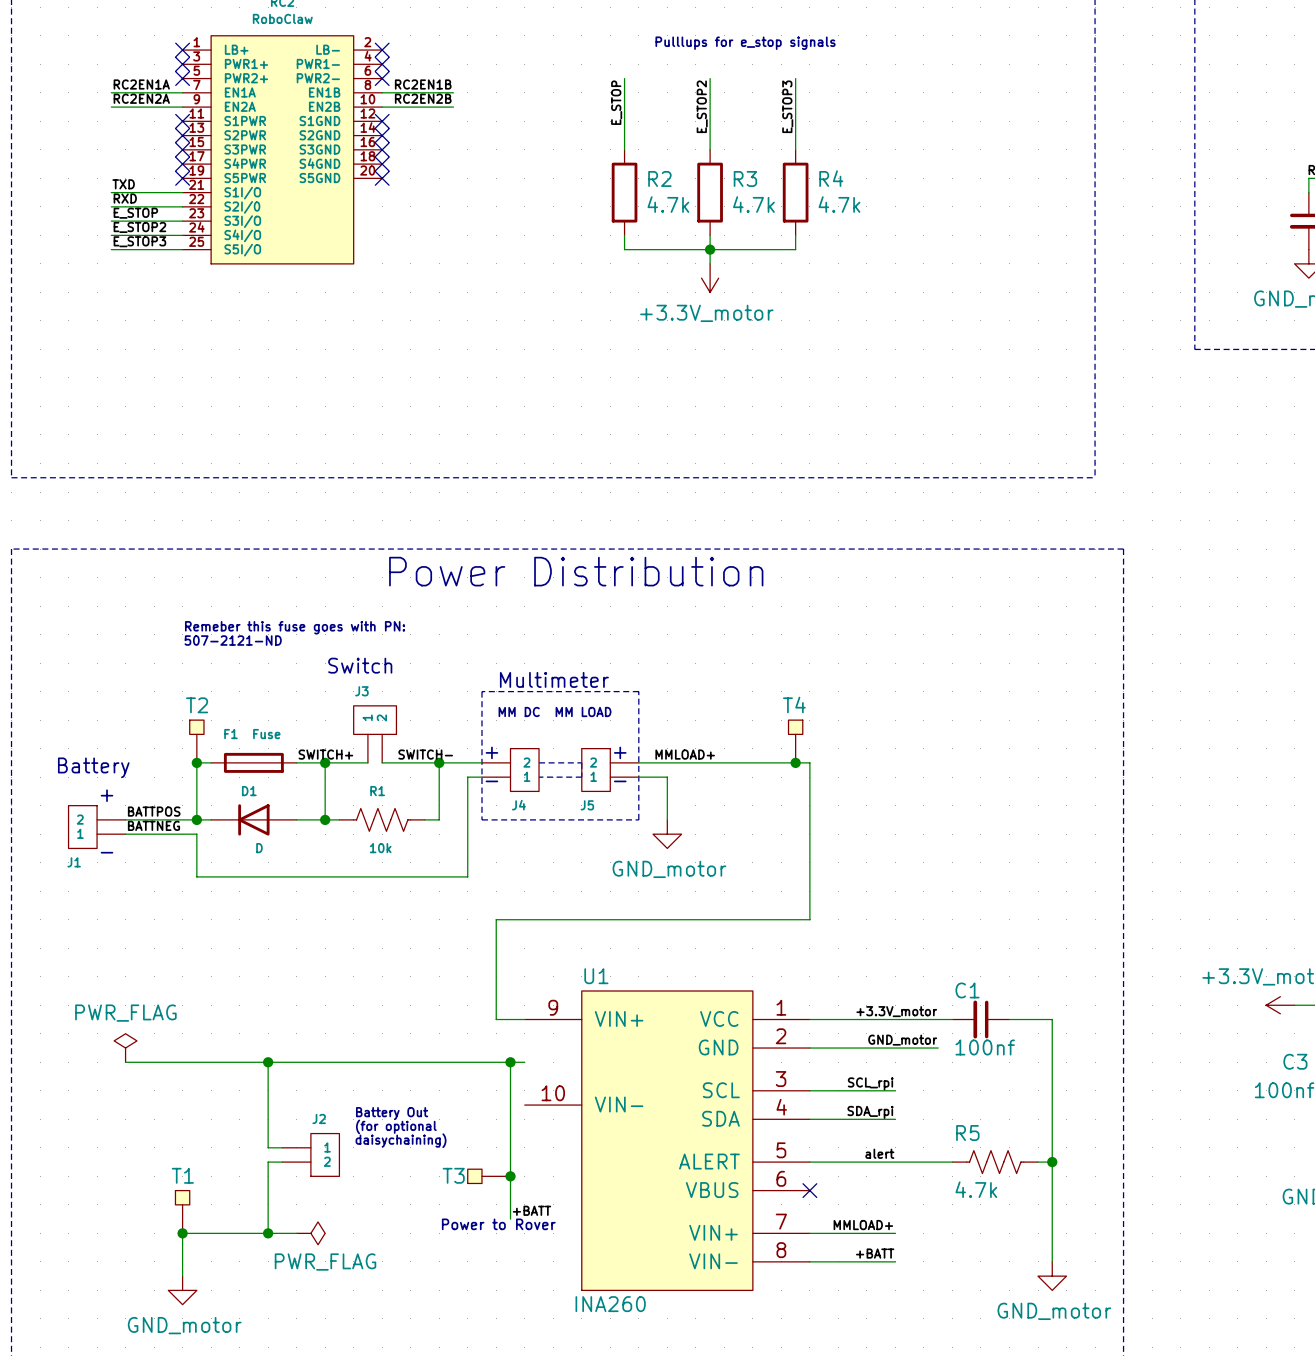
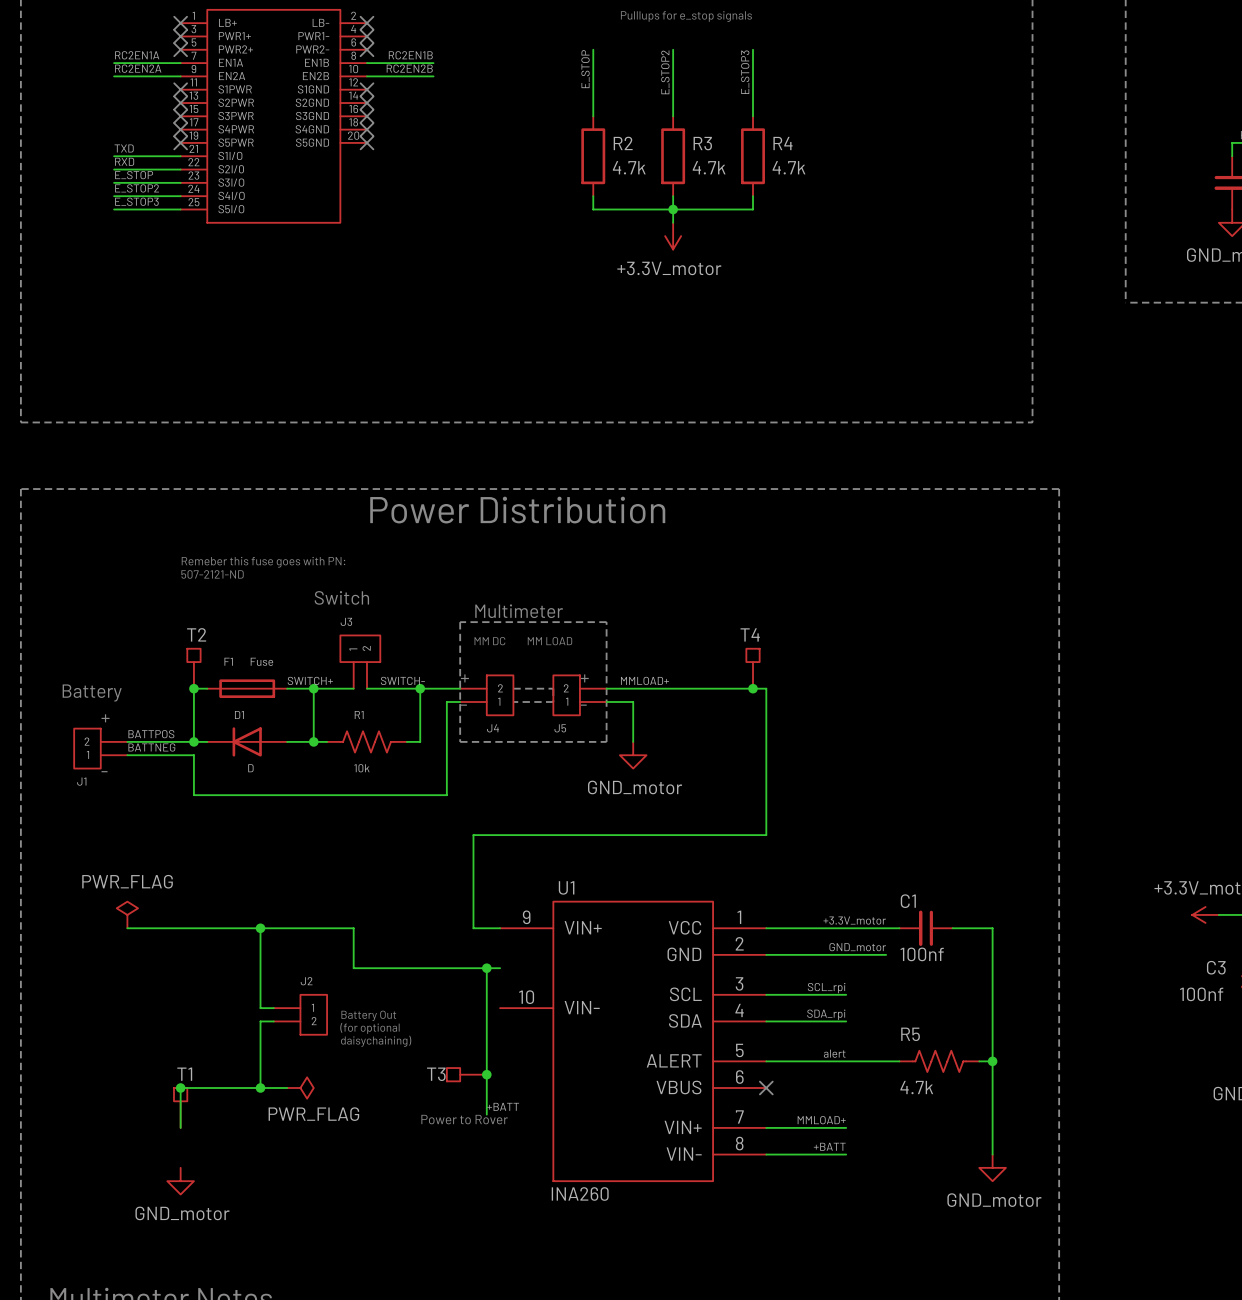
power symbol position: PWR_FLAG (125, 1048) -> PWR_FLAG (127, 914)
wire: (125, 1062) (367, 1062) -> (127, 928) (353, 928) (353, 968)
junction position: (268, 1062) -> (260, 928)
wire: (268, 1105) (268, 1119) -> (260, 1008) (273, 1008)
wire: (268, 1147) (282, 1147) -> (260, 1048) (260, 1061)
J2 position: (310, 1154) -> (300, 1014)
wire: (268, 1162) (282, 1162) -> (260, 1021) (273, 1021)
wire: (268, 1190) (268, 1233) -> (260, 928) (260, 968)
junction position: (182, 1233) -> (180, 1088)
junction position: (268, 1233) -> (260, 1088)
wire: (296, 1233) (182, 1233) (182, 1276) -> (287, 1088) (180, 1088) (180, 1127)
power symbol position: PWR_FLAG (310, 1233) -> PWR_FLAG (300, 1088)

